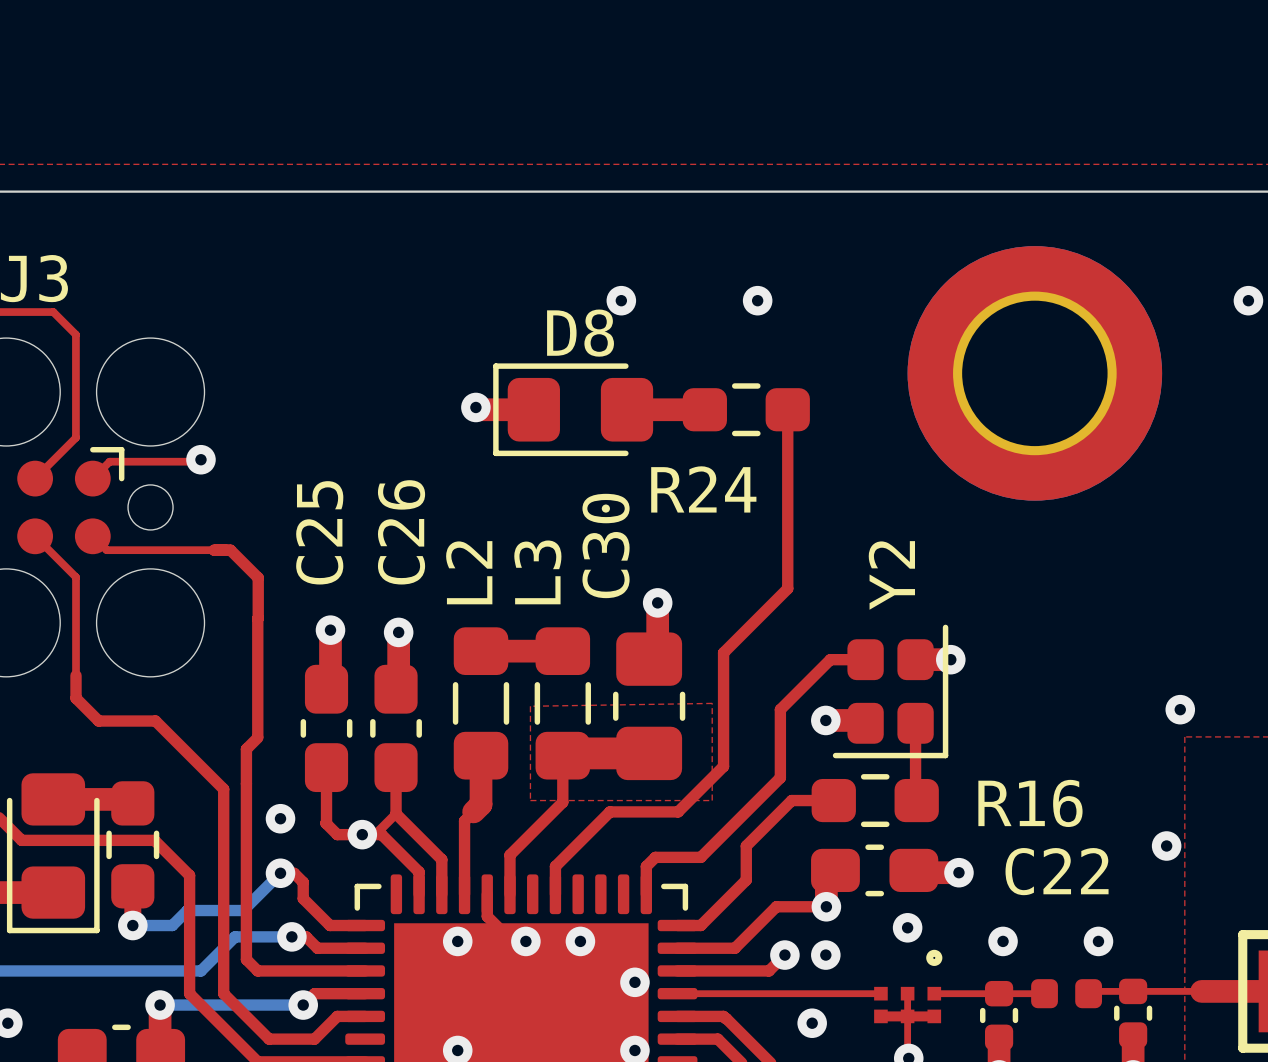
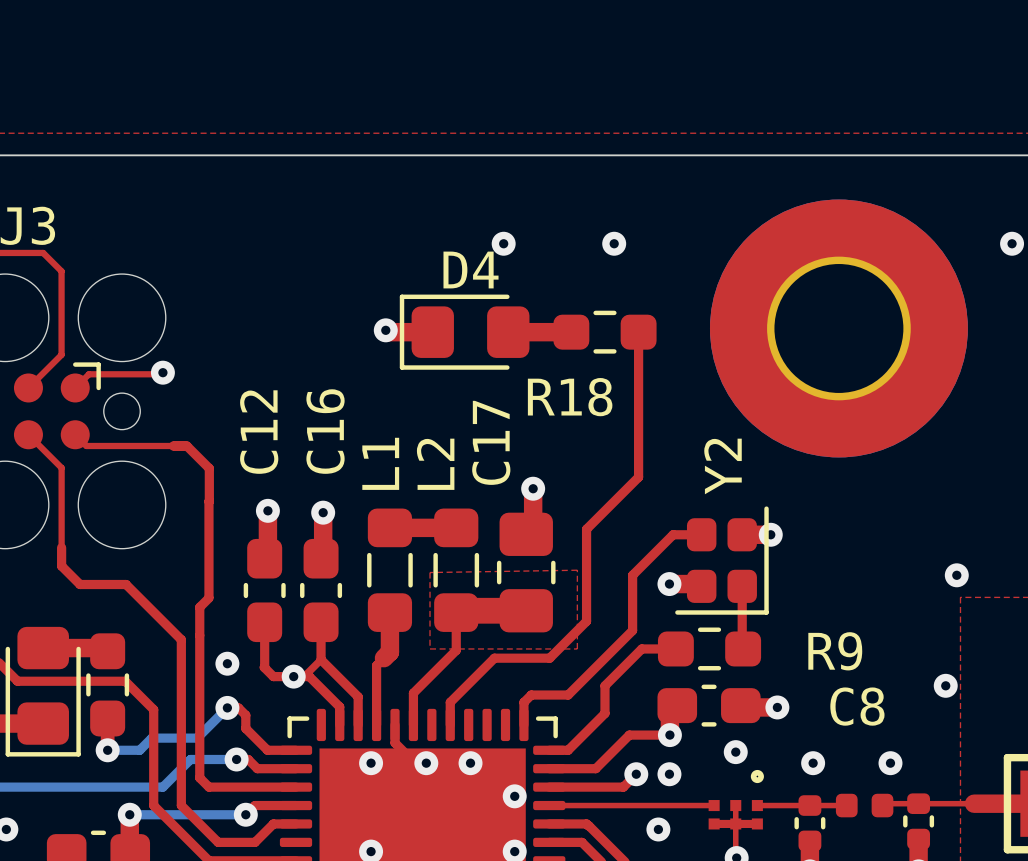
part footprint: [907, 246, 1163, 501] -> [709, 199, 968, 458]
D8 name: D8 (580, 333) -> D4 (471, 270)
R24 name: R24 (703, 489) -> R18 (570, 397)
C25 name: C25 (319, 532) -> C12 (259, 432)
C26 name: C26 (401, 532) -> C16 (325, 431)
C30 name: C30 (606, 545) -> C17 (491, 442)
L2 name: L2 (469, 572) -> L1 (380, 463)
L3 name: L3 (537, 572) -> L2 (435, 464)
R16 name: R16 (1030, 803) -> R9 (835, 651)
C22 name: C22 (1057, 871) -> C8 (857, 706)

